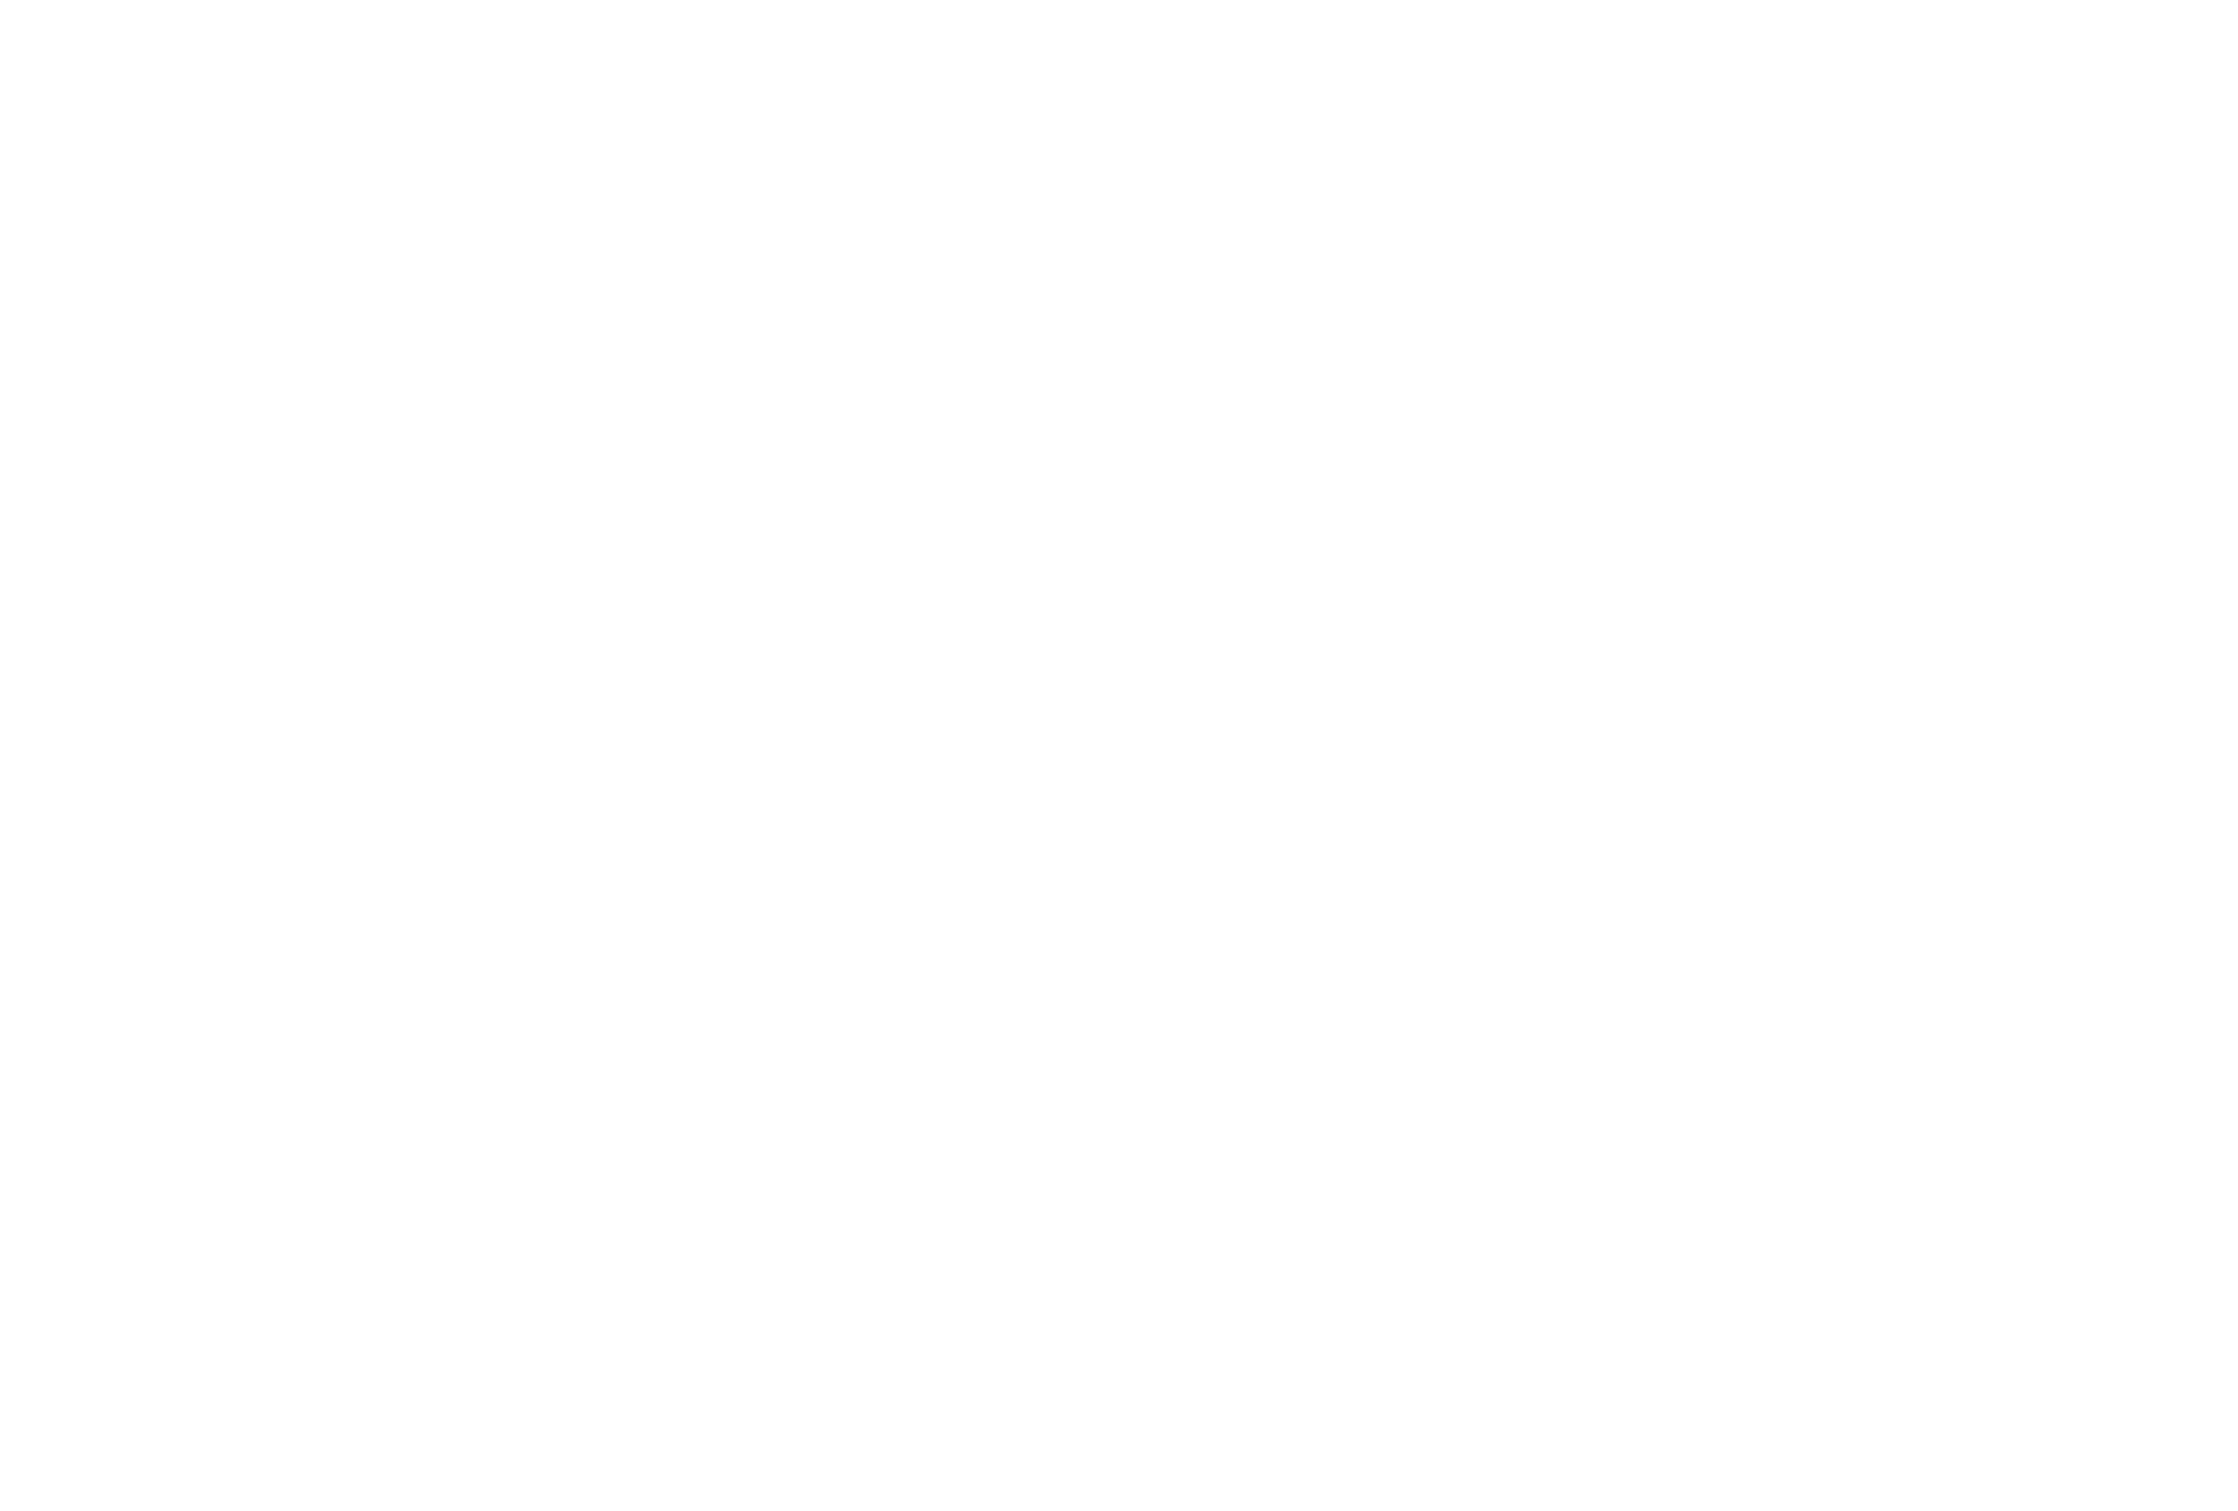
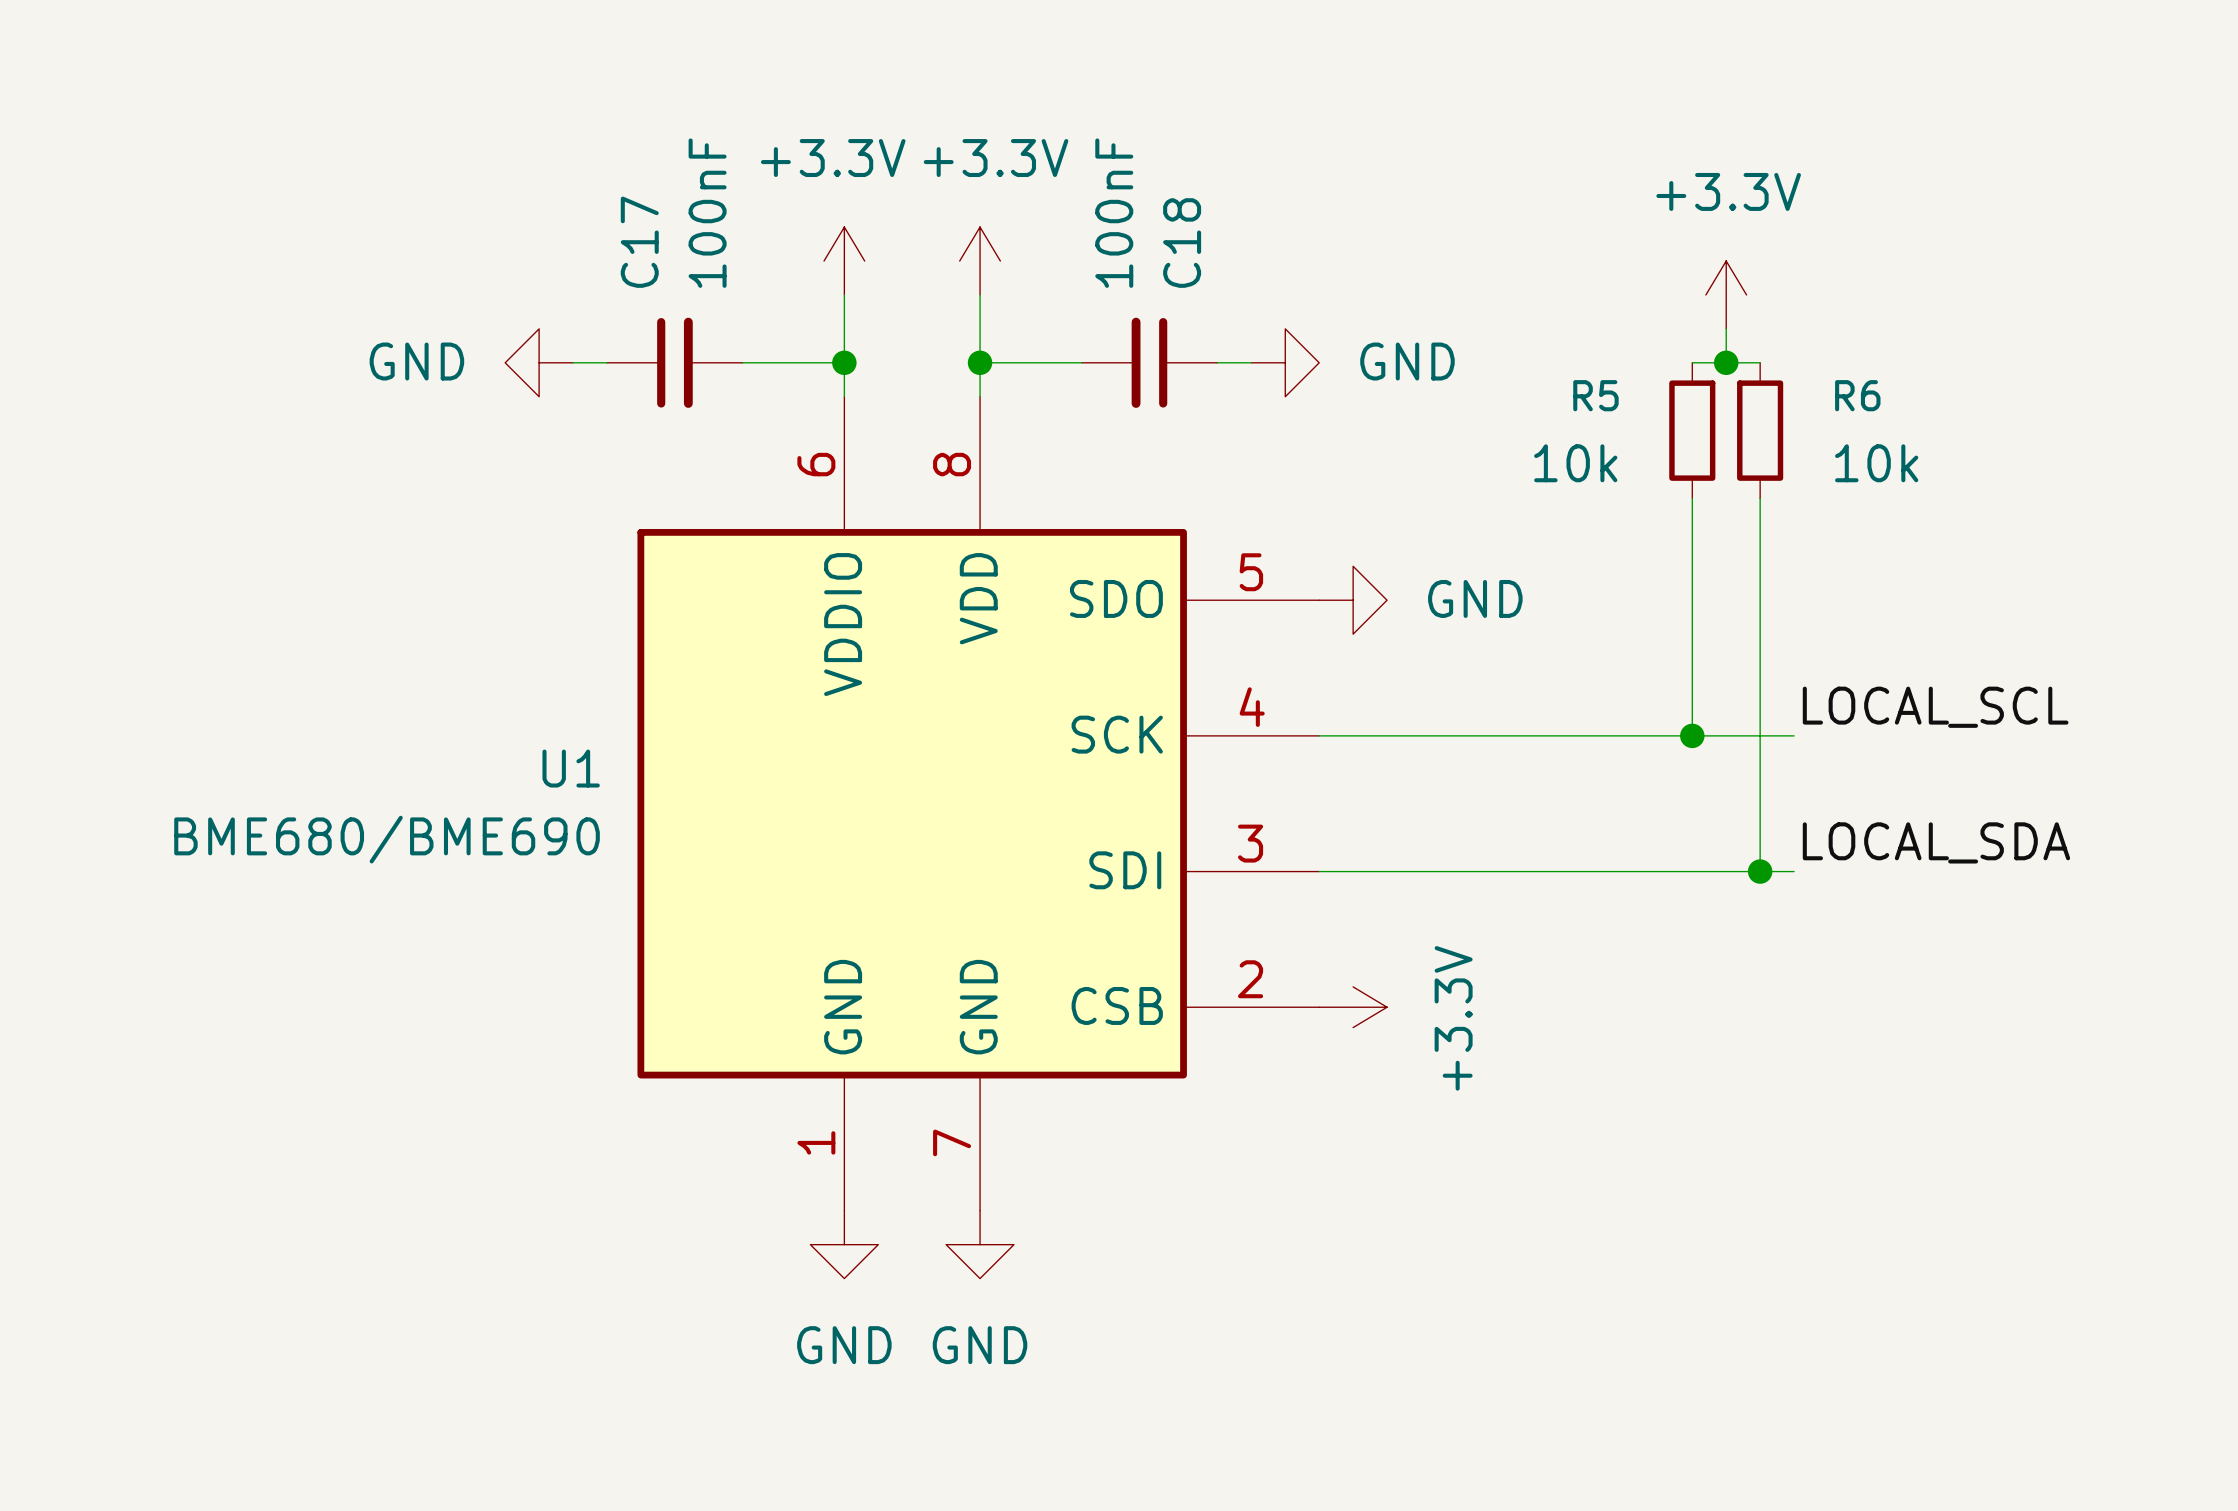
power symbol: none -> +3.3V (844, 261)
power symbol: none -> +3.3V (980, 261)
wire: none -> (844, 294) (844, 396)
wire: none -> (980, 294) (980, 396)
power symbol: none -> +3.3V (1726, 294)
wire: none -> (1726, 328) (1726, 362)
power symbol: none -> GND (539, 362)
wire: none -> (573, 362) (606, 362)
C17: none -> 100nF (674, 362)
wire: none -> (742, 362) (844, 362)
junction: none -> (844, 362)
wire: none -> (980, 362) (1081, 362)
junction: none -> (980, 362)
C18: none -> 100nF (1149, 362)
wire: none -> (1217, 362) (1251, 362)
power symbol: none -> GND (1285, 362)
wire: none -> (1692, 362) (1760, 362)
junction: none -> (1726, 362)
R5: none -> 10k (1692, 430)
R6: none -> 10k (1760, 430)
wire: none -> (1692, 498) (1692, 735)
wire: none -> (1760, 498) (1760, 871)
power symbol: none -> GND (1353, 600)
label: none -> LOCAL_SCL (1935, 707)
wire: none -> (1319, 735) (1794, 735)
junction: none -> (1692, 735)
U1: none -> BME680/BME690 (978, 803)
label: none -> LOCAL_SDA (1936, 842)
wire: none -> (1319, 871) (1794, 871)
junction: none -> (1760, 871)
power symbol: none -> +3.3V (1353, 1007)
power symbol: none -> GND (844, 1244)
power symbol: none -> GND (980, 1244)

